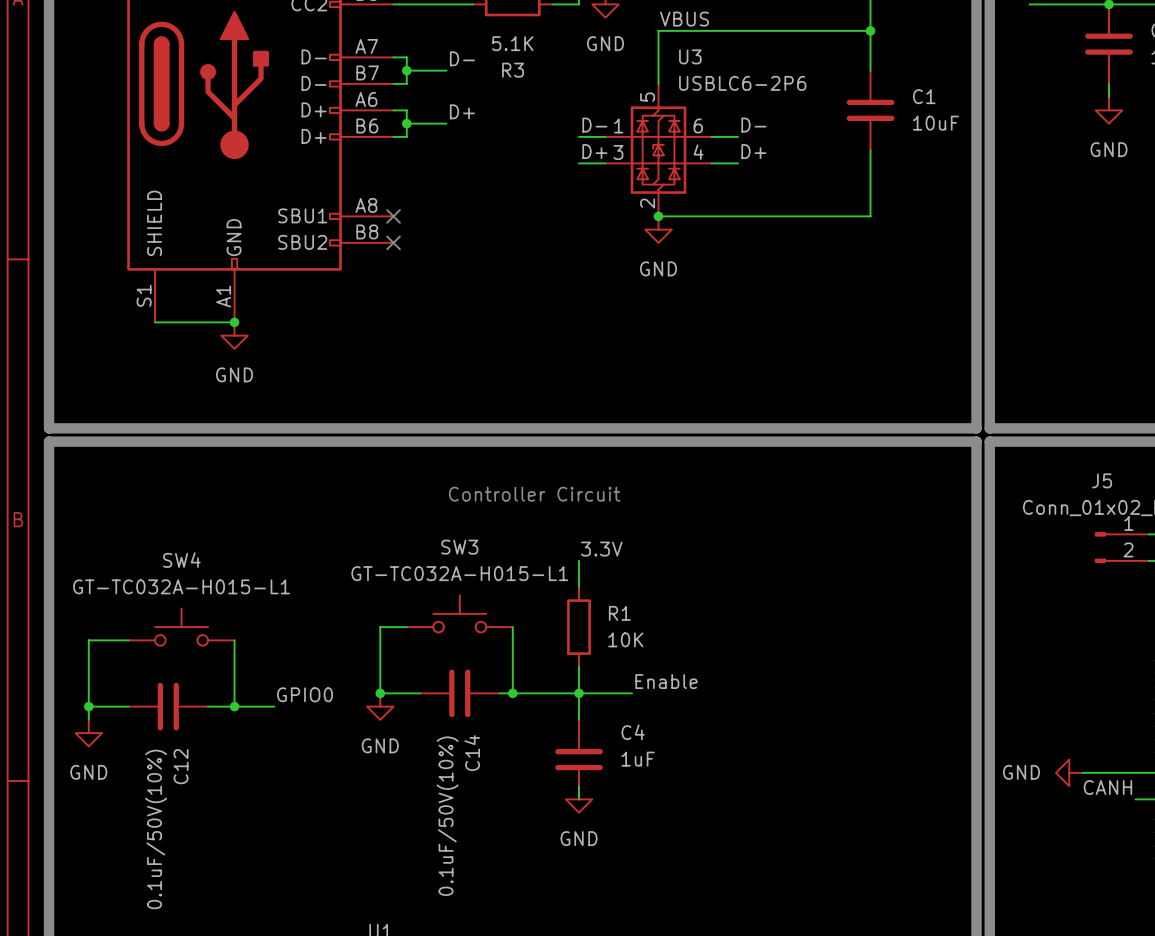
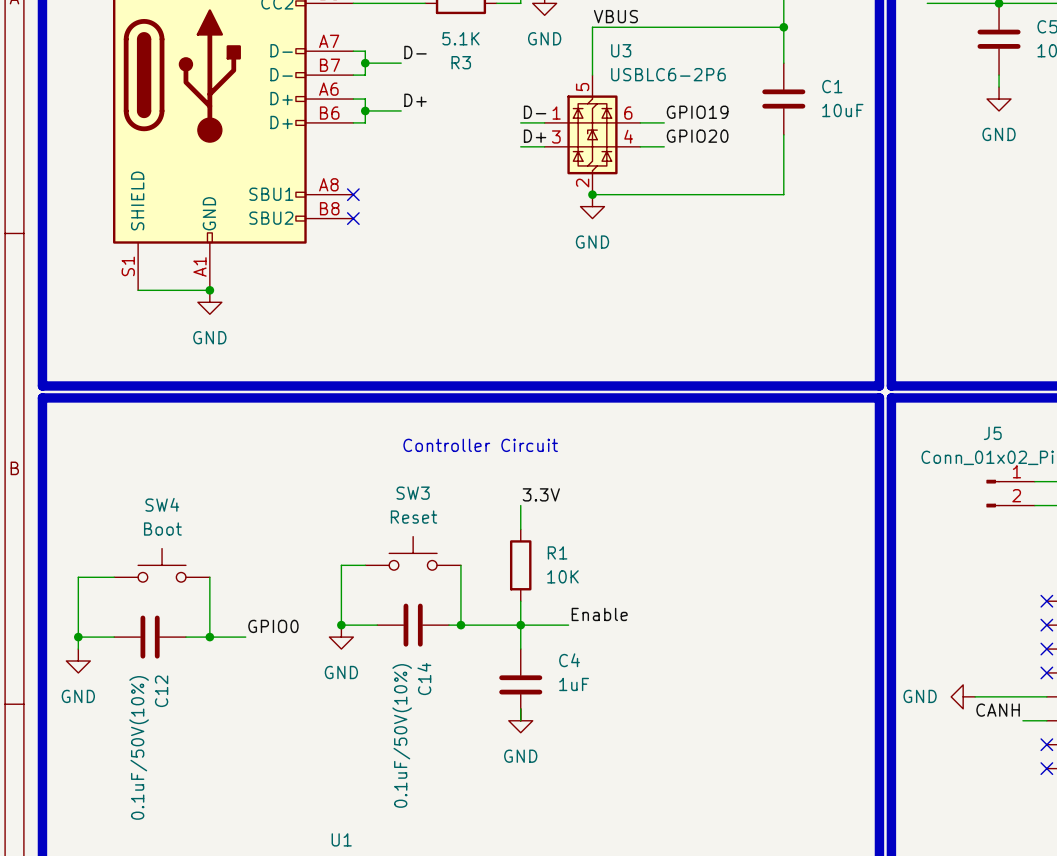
label: D- (753, 125) -> GPIO19 (697, 112)
label: D+ (753, 151) -> GPIO20 (697, 136)
SW3 value: GT-TC032A-H015-L1 (459, 573) -> Reset (413, 517)
SW4 value: GT-TC032A-H015-L1 (181, 586) -> Boot (162, 529)

